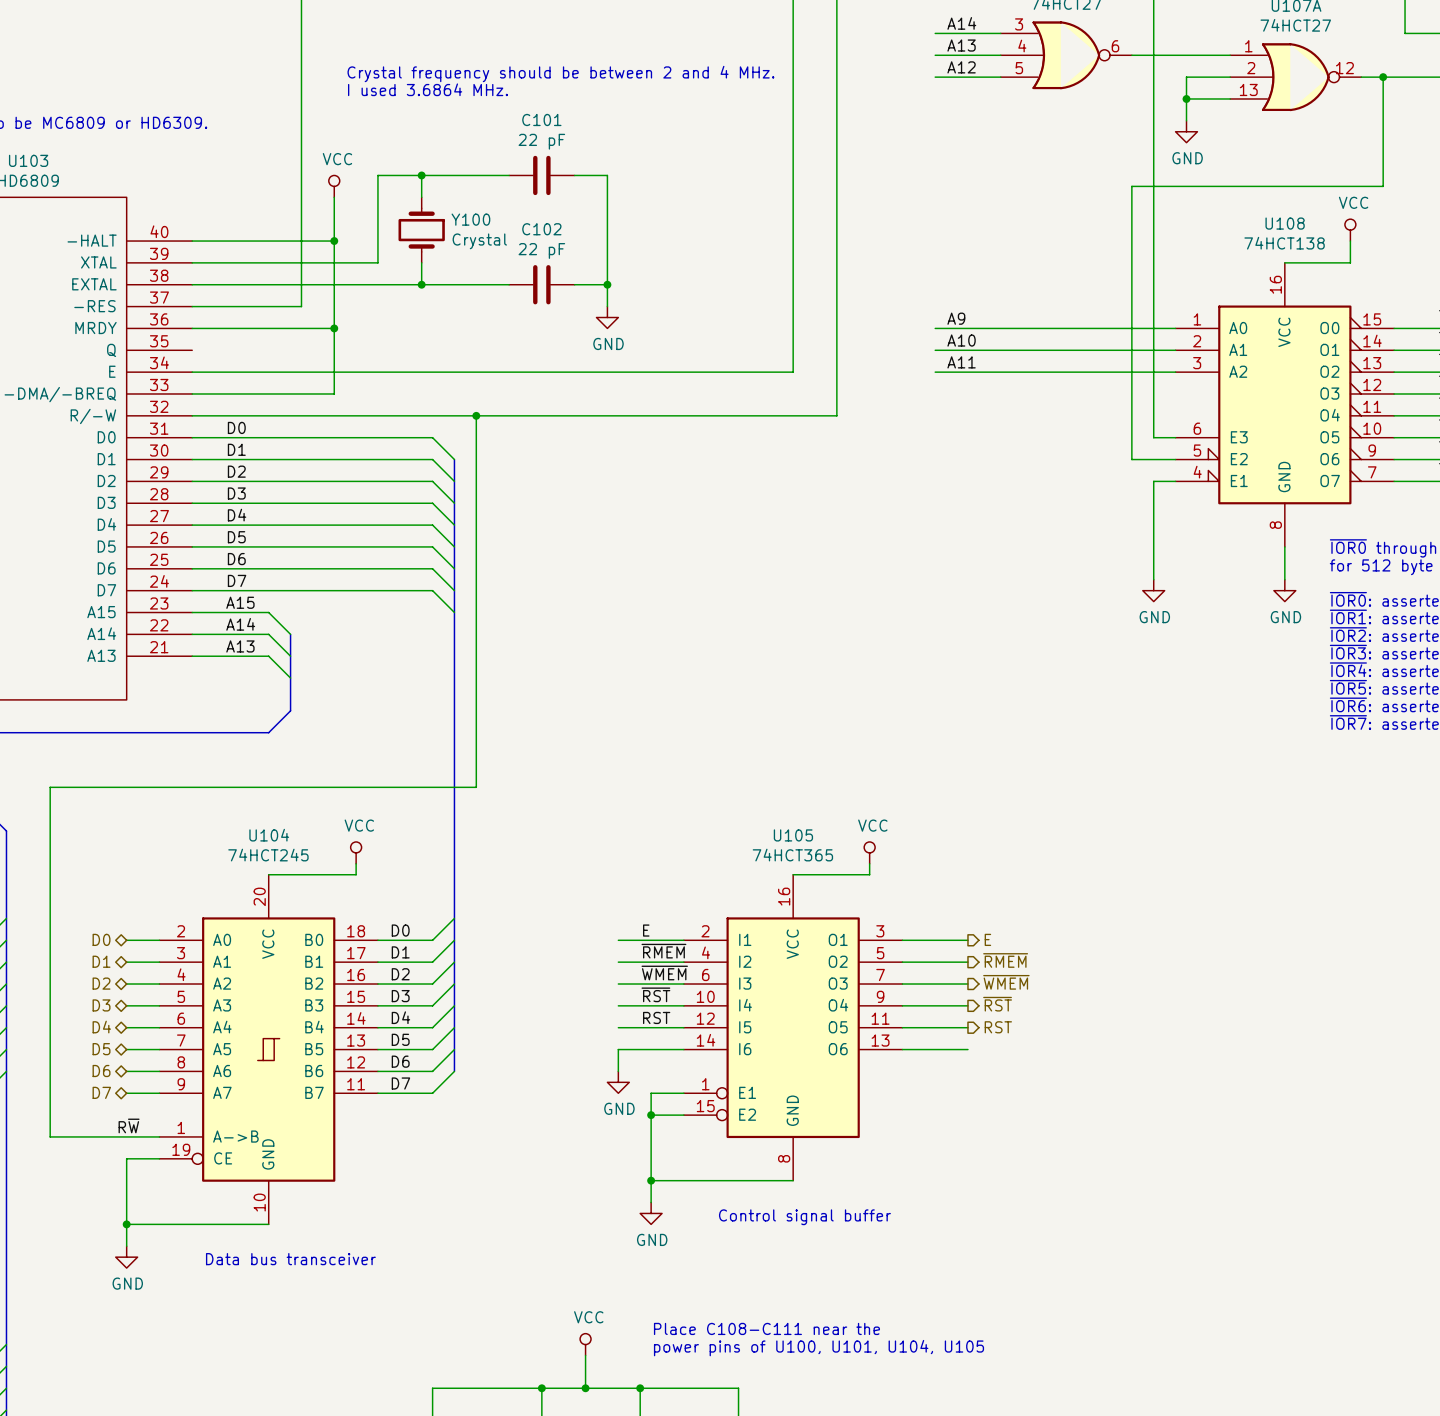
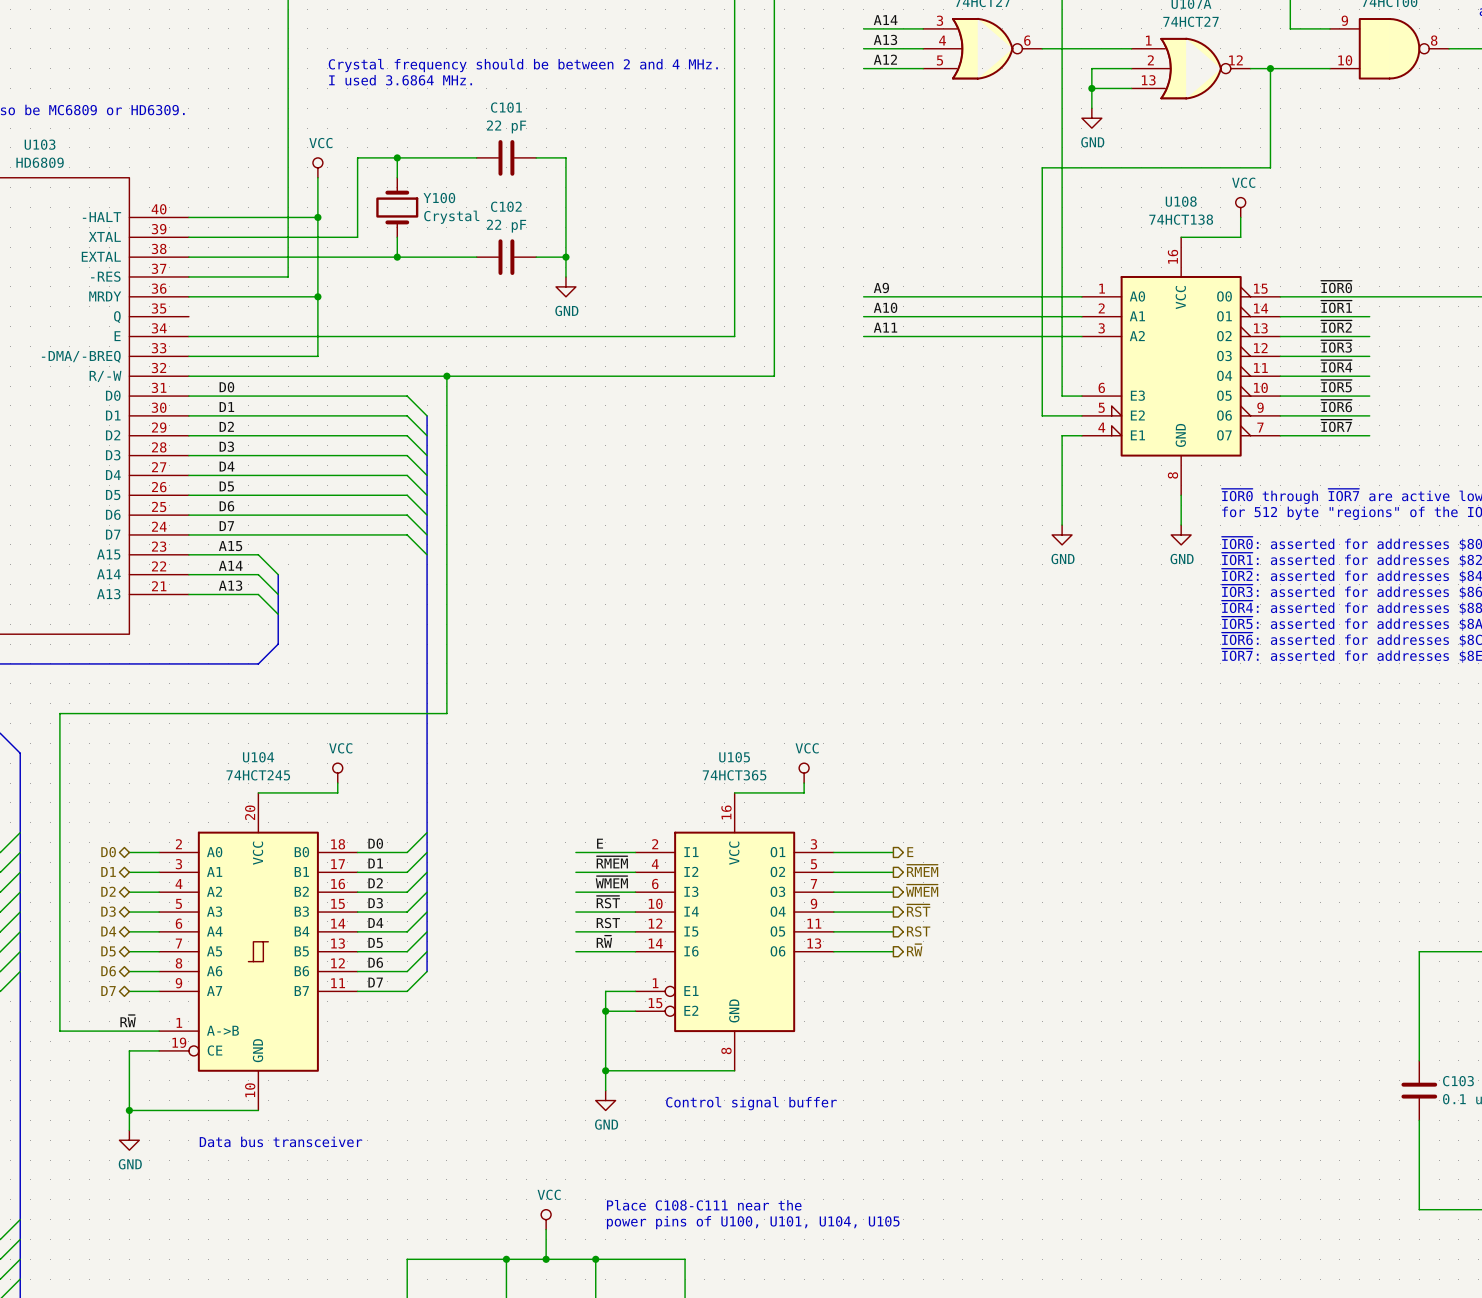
label: none -> R~{W} (604, 941)
hierarchical label: none -> R~{W} (914, 950)
wire: (618, 1049) (618, 1071) -> none
power symbol: GND (618, 1082) -> none

